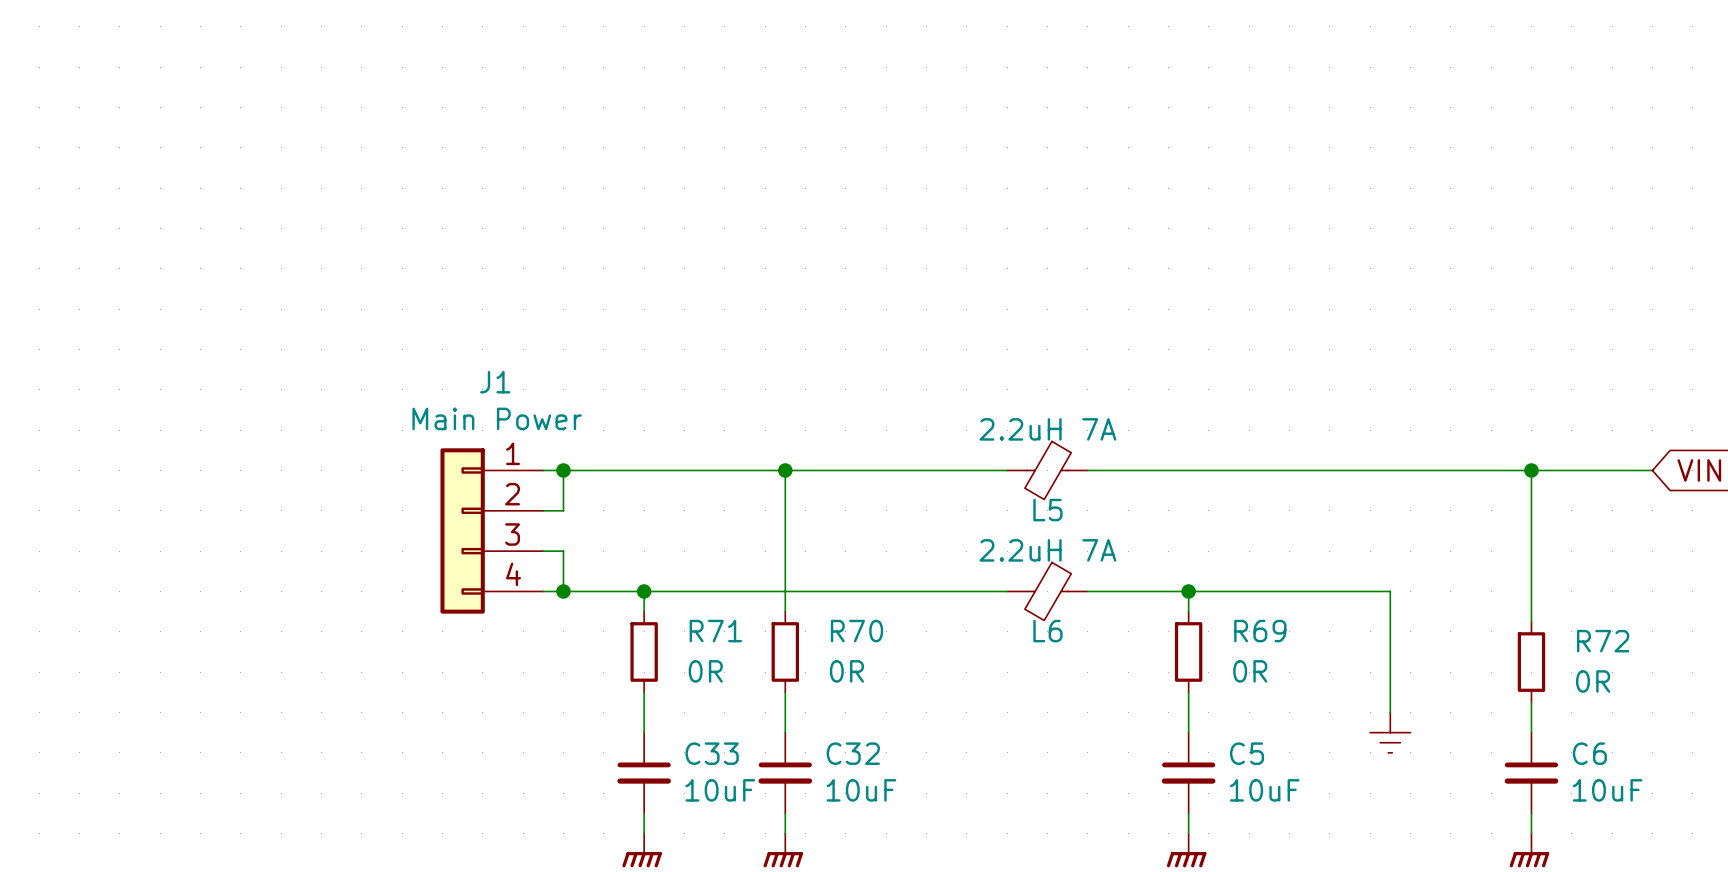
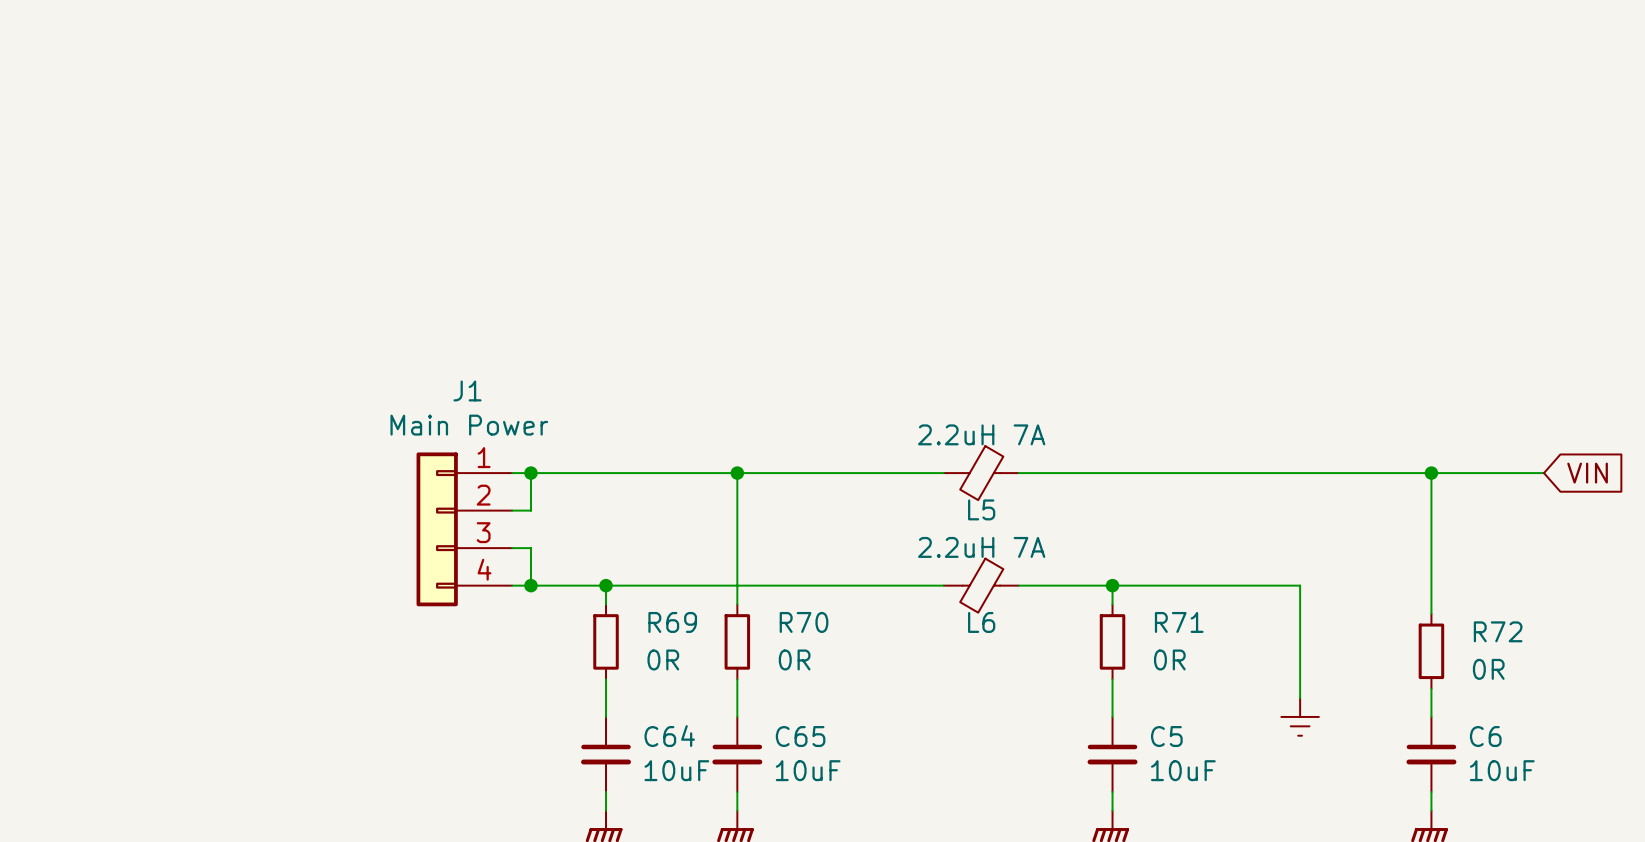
R71 name: R71 (715, 631) -> R69 (672, 622)
R69 name: R69 (1260, 631) -> R71 (1179, 622)
C33 name: C33 (712, 753) -> C64 (669, 736)
C32 name: C32 (853, 753) -> C65 (800, 736)

